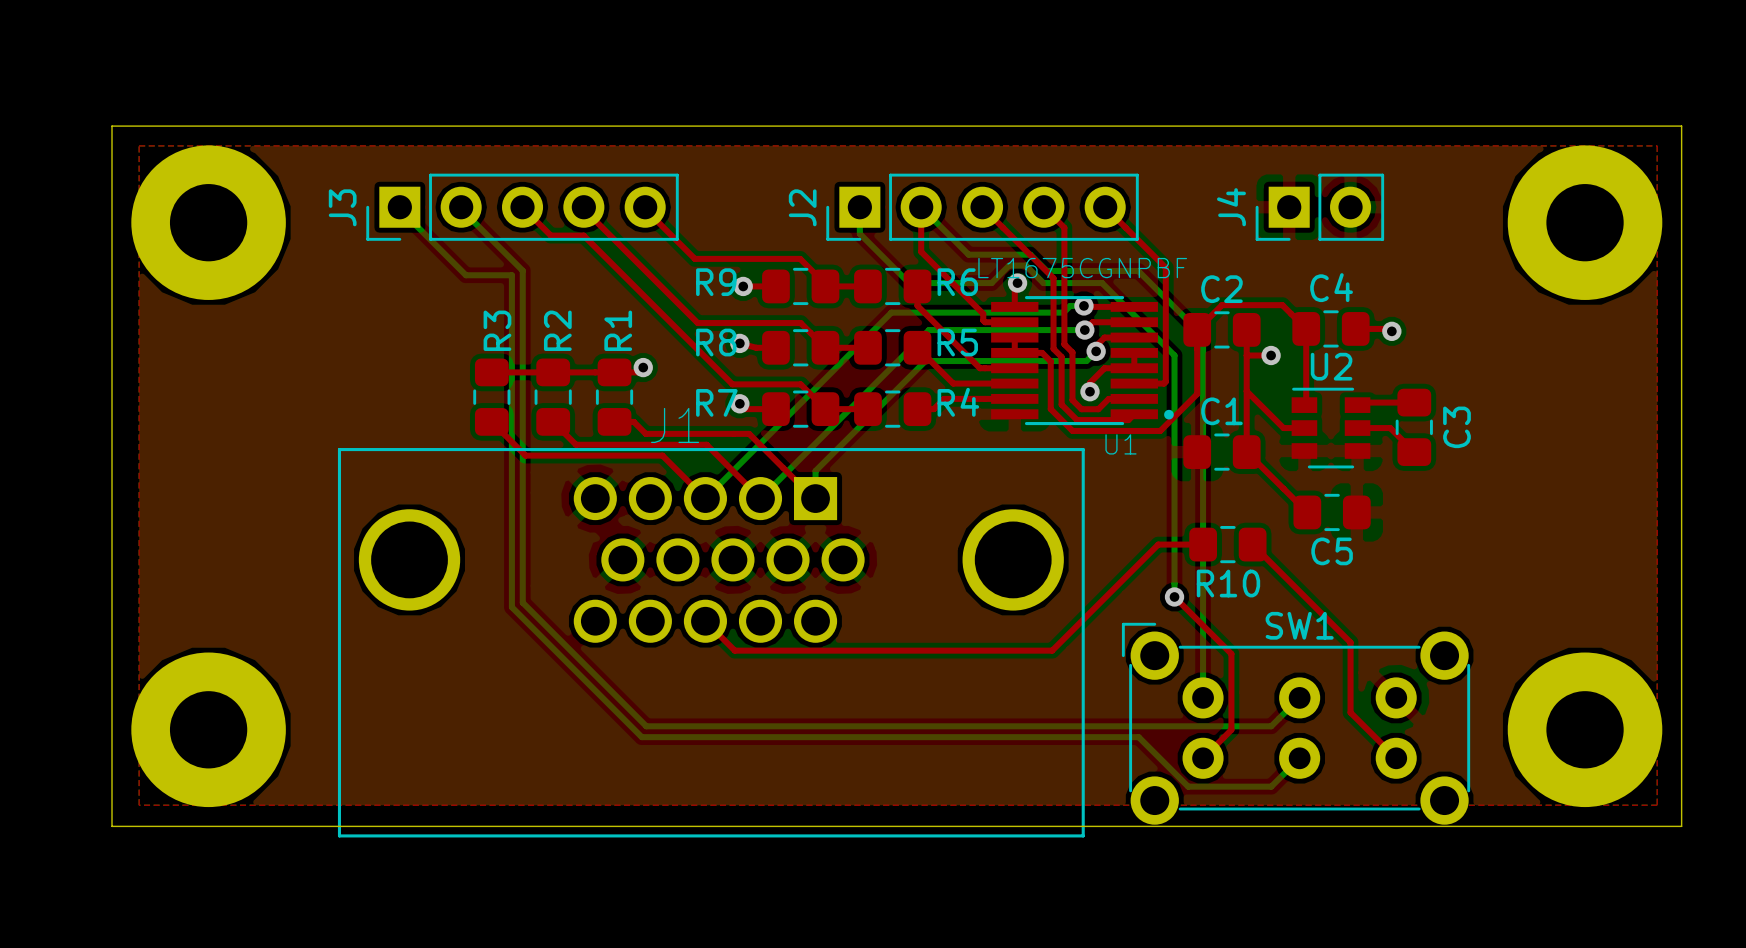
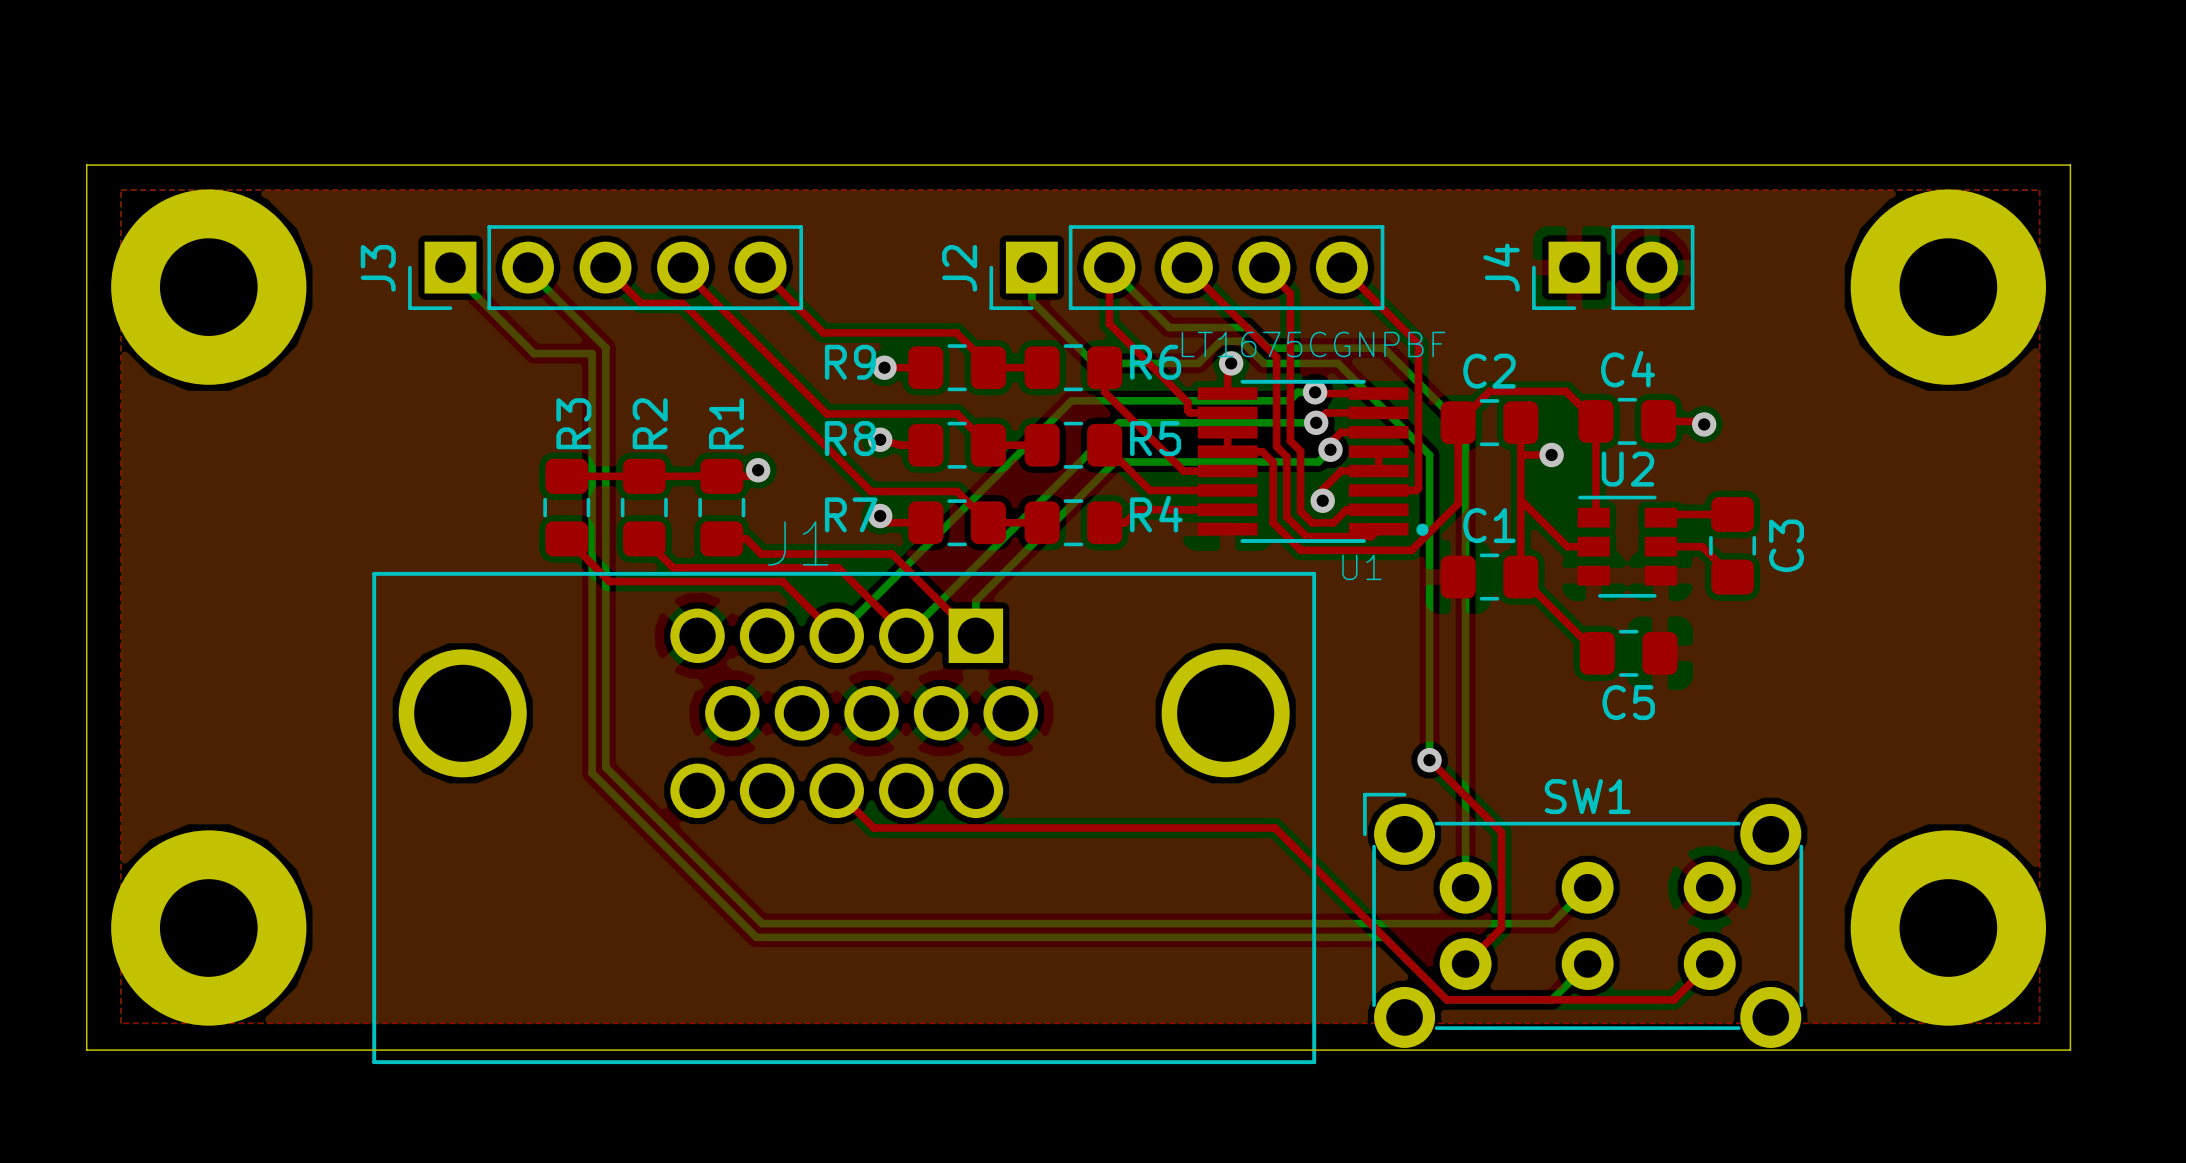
top track: (1203, 544) (1158, 544) (1052, 650) -> none
R10: (1227, 544) -> none
top track: (1252, 544) (1350, 642) (1350, 712) (1396, 758) -> (1274, 827) (1446, 999) (1673, 999) (1709, 964)

